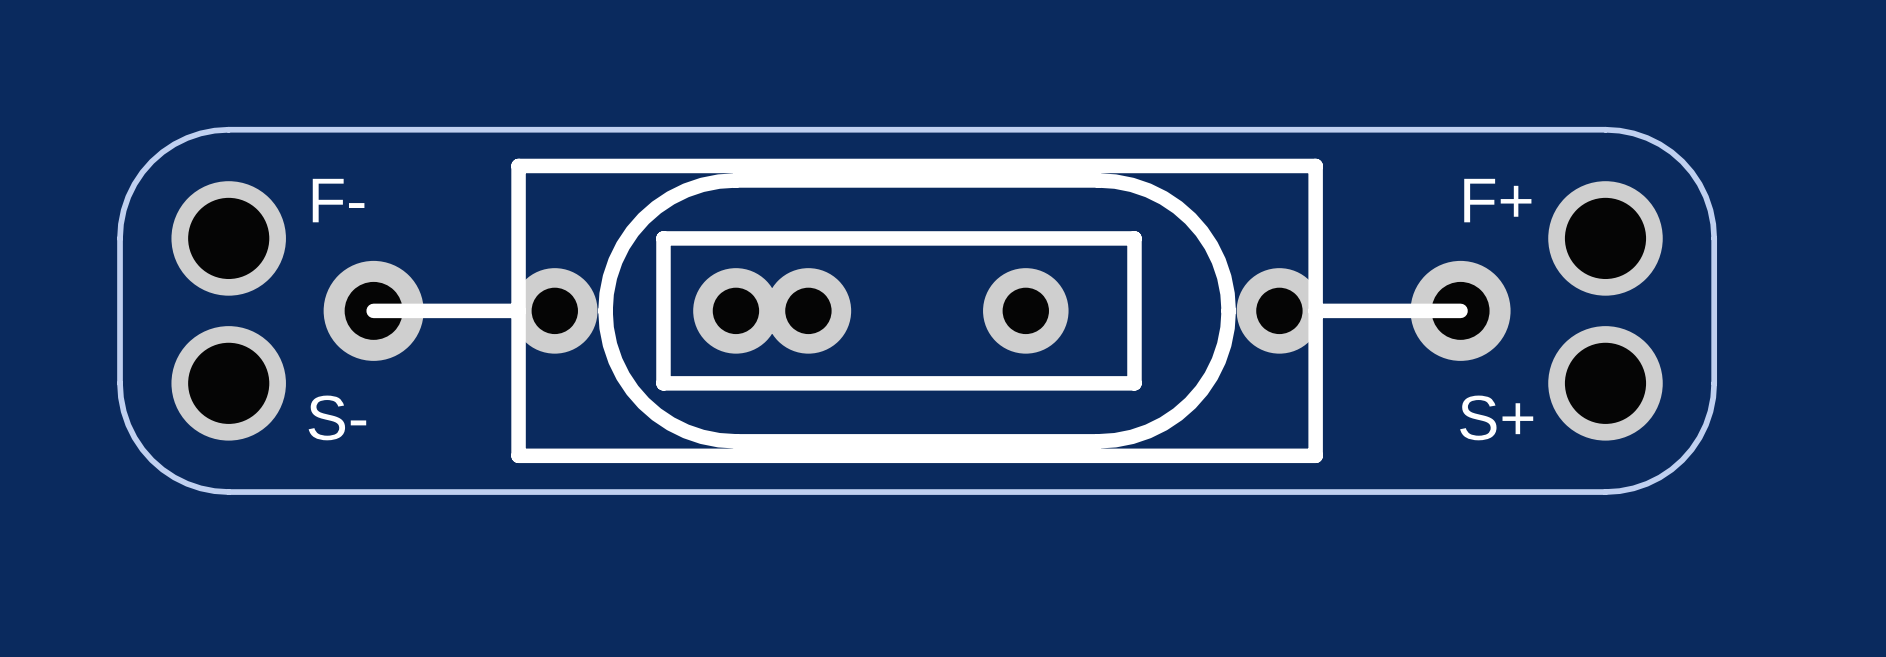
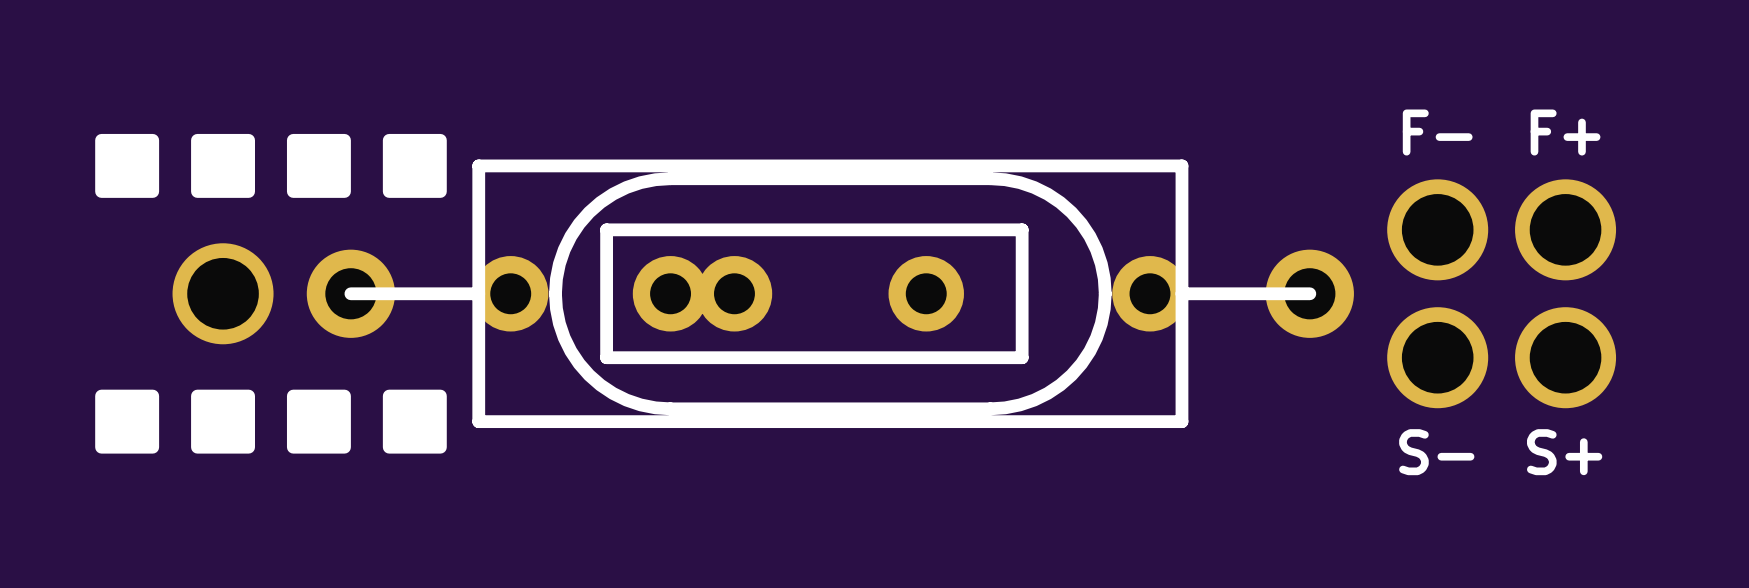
drawing: none -> [95, 133, 447, 198]
text position: F- (338, 200) -> F- (1437, 132)
text position: F+ (1497, 200) -> F+ (1565, 132)
part: (228, 238) -> none
part: none -> (1565, 229)
part: none -> (223, 293)
part: (228, 383) -> none
part: none -> (1565, 357)
text position: S- (337, 417) -> S- (1436, 452)
text position: S+ (1496, 417) -> S+ (1564, 452)
drawing: none -> [95, 389, 447, 454]
board edge: (1605, 492) (214, 491) (187, 483) (162, 469) (142, 449) (128, 424) (123, 411) (120, 383) (120, 224) (128, 196) (134, 184) (151, 161) (162, 152) (174, 144) (200, 133) (228, 129) (1619, 130) (1647, 138) (1671, 152) (1691, 172) (1705, 196) (1713, 224) (1714, 238) (1714, 383) (1713, 397) (1705, 424) (1699, 437) (1682, 460) (1659, 477) (1647, 483) (1619, 491) (1605, 492) -> none

